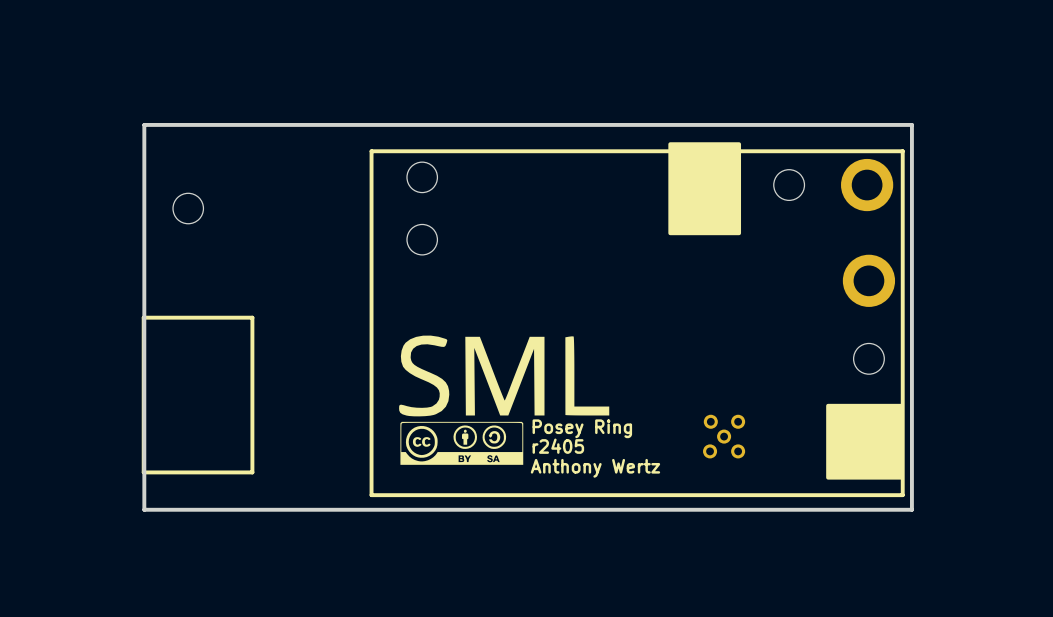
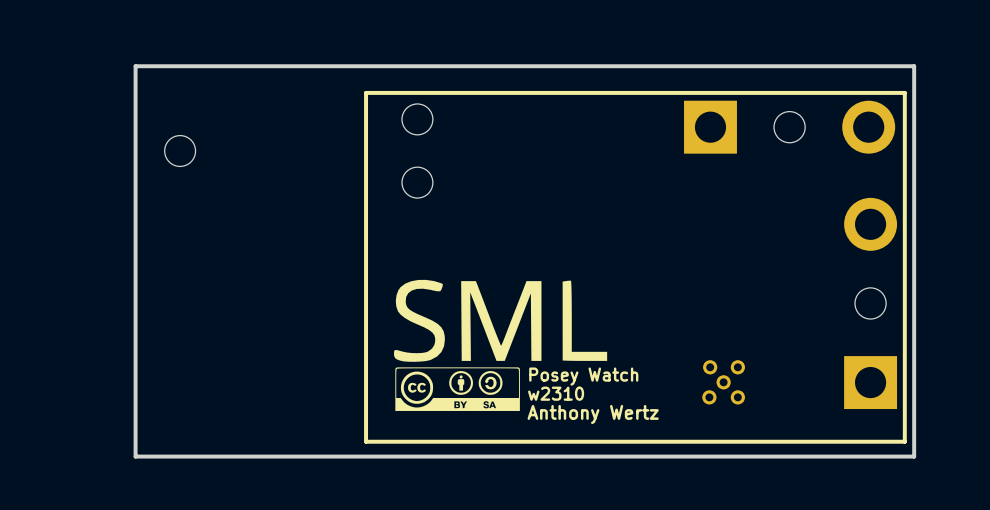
drawing: [668, 142, 742, 236] -> none
line: (252, 317) (143, 317) (143, 472) (252, 472) (252, 317) -> none
drawing: [826, 403, 903, 480] -> none
text: Posey Ring (582, 428) -> Posey Watch (583, 376)
text: r2405 (558, 446) -> w2310 (556, 393)

